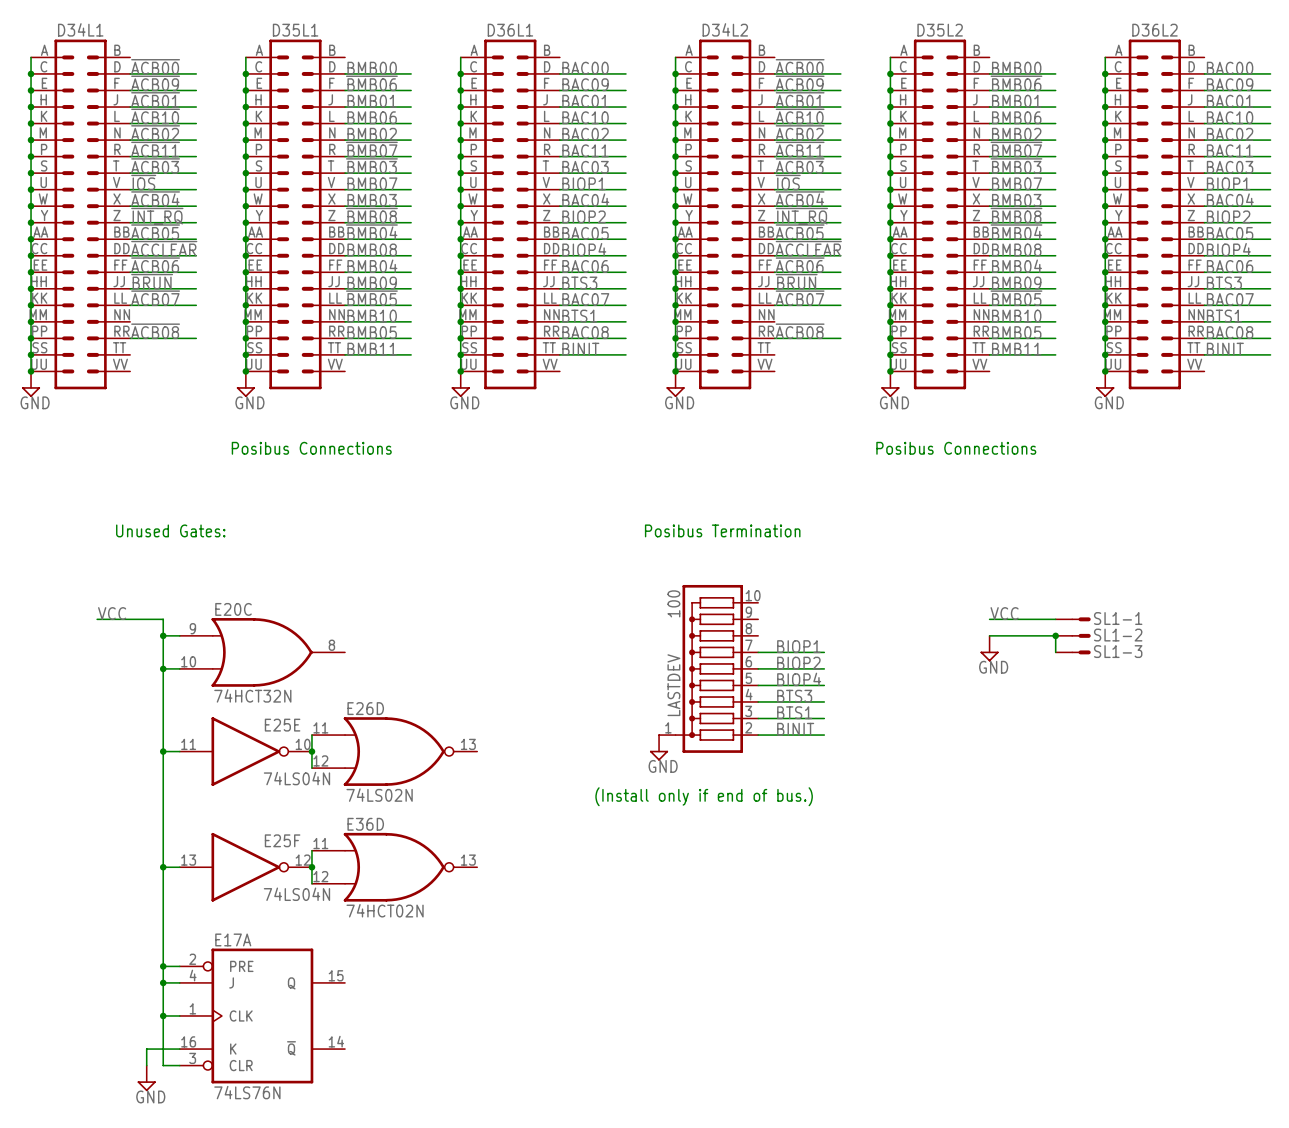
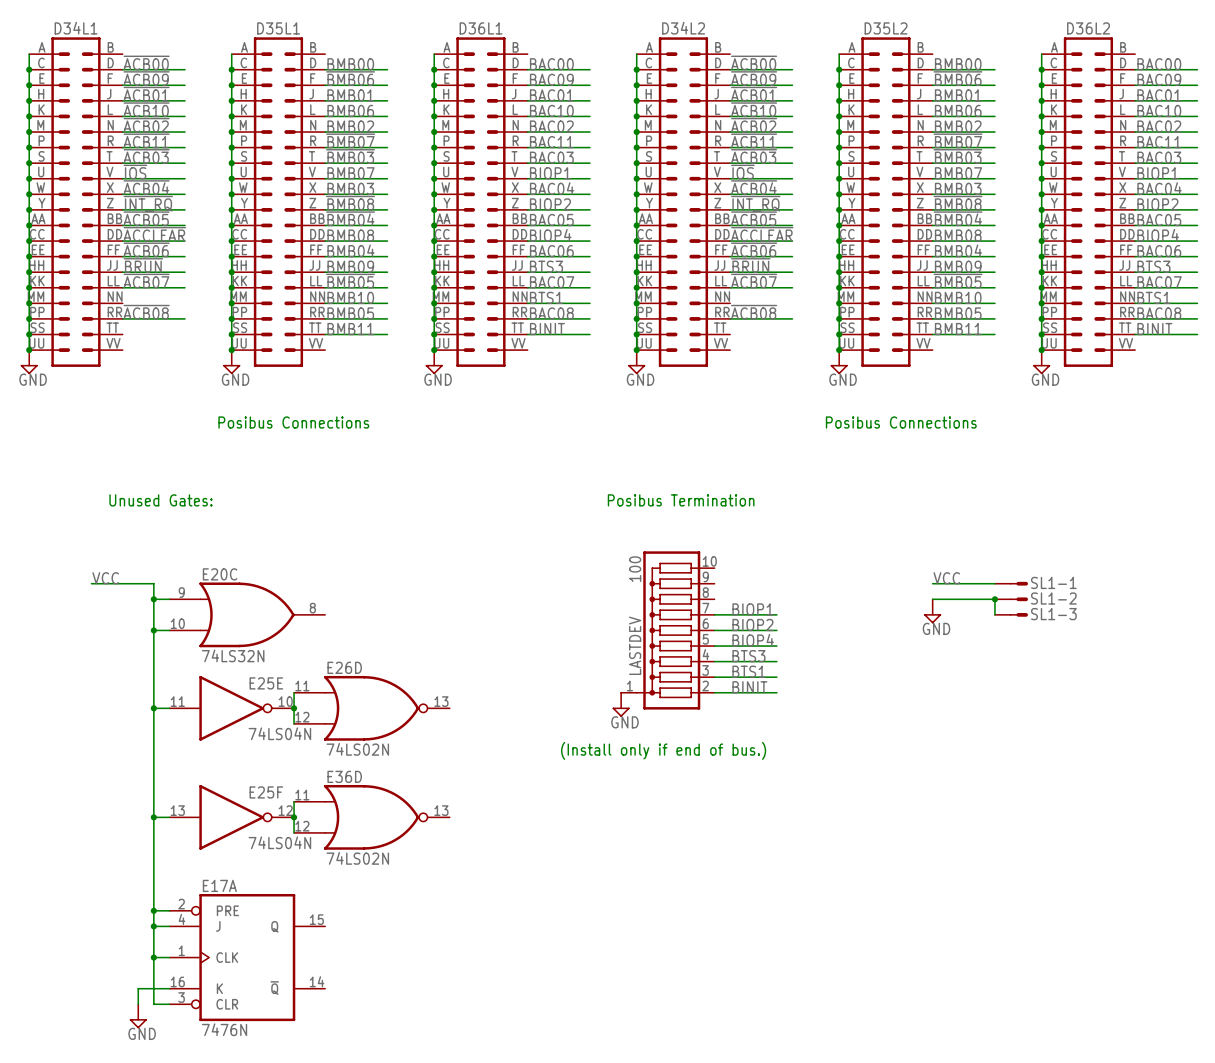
E20C value: 74HCT32N (252, 695) -> 74LS32N (233, 655)
E36D value: 74HCT02N (385, 910) -> 74LS02N (357, 858)
E17A value: 74LS76N (247, 1092) -> 7476N (224, 1029)

